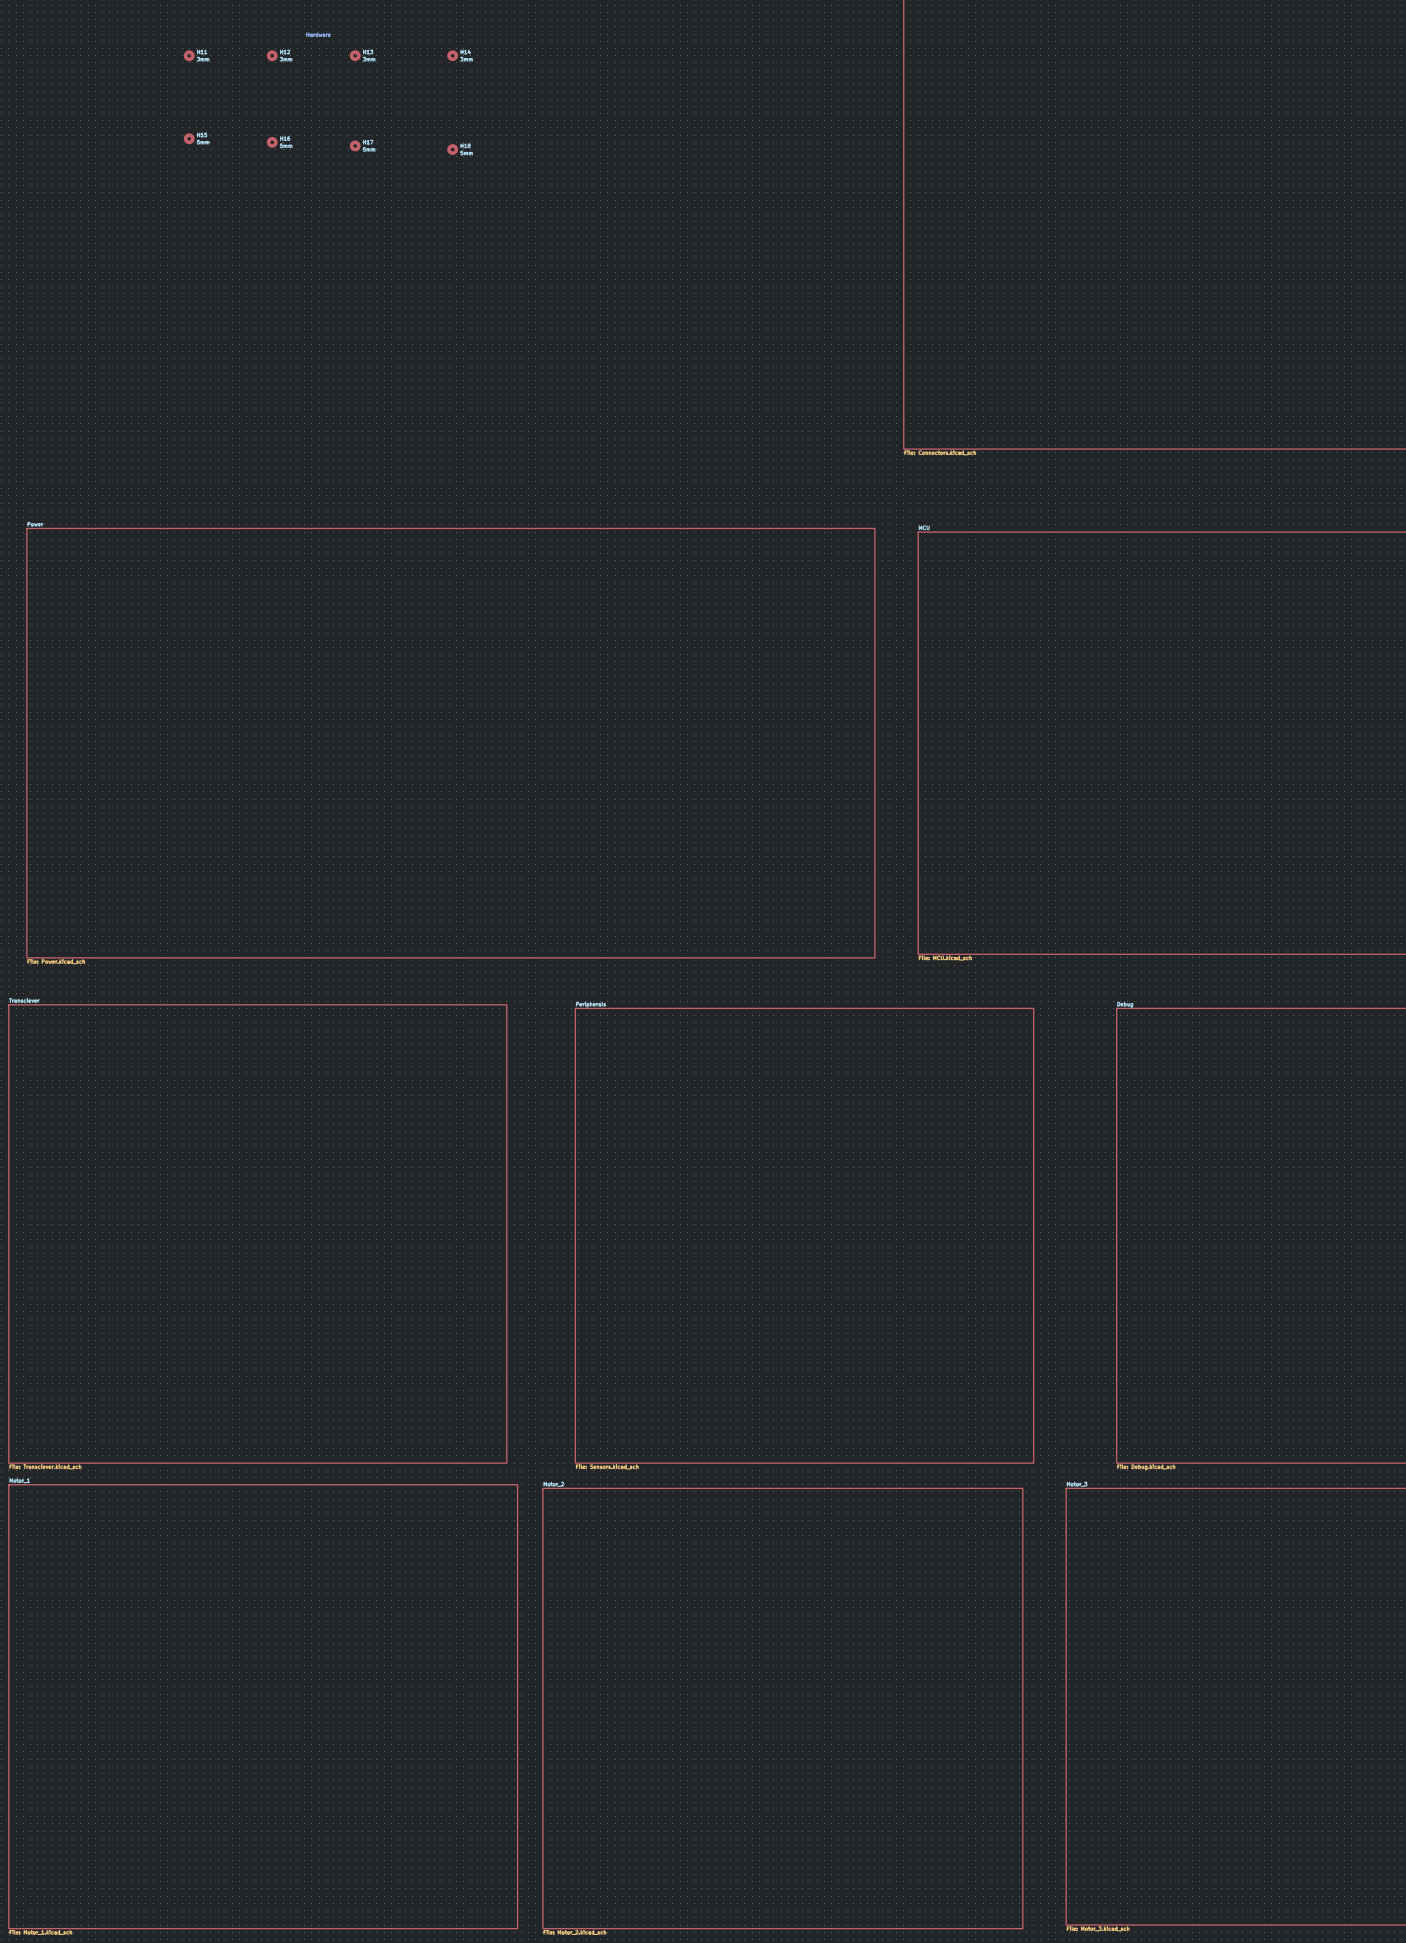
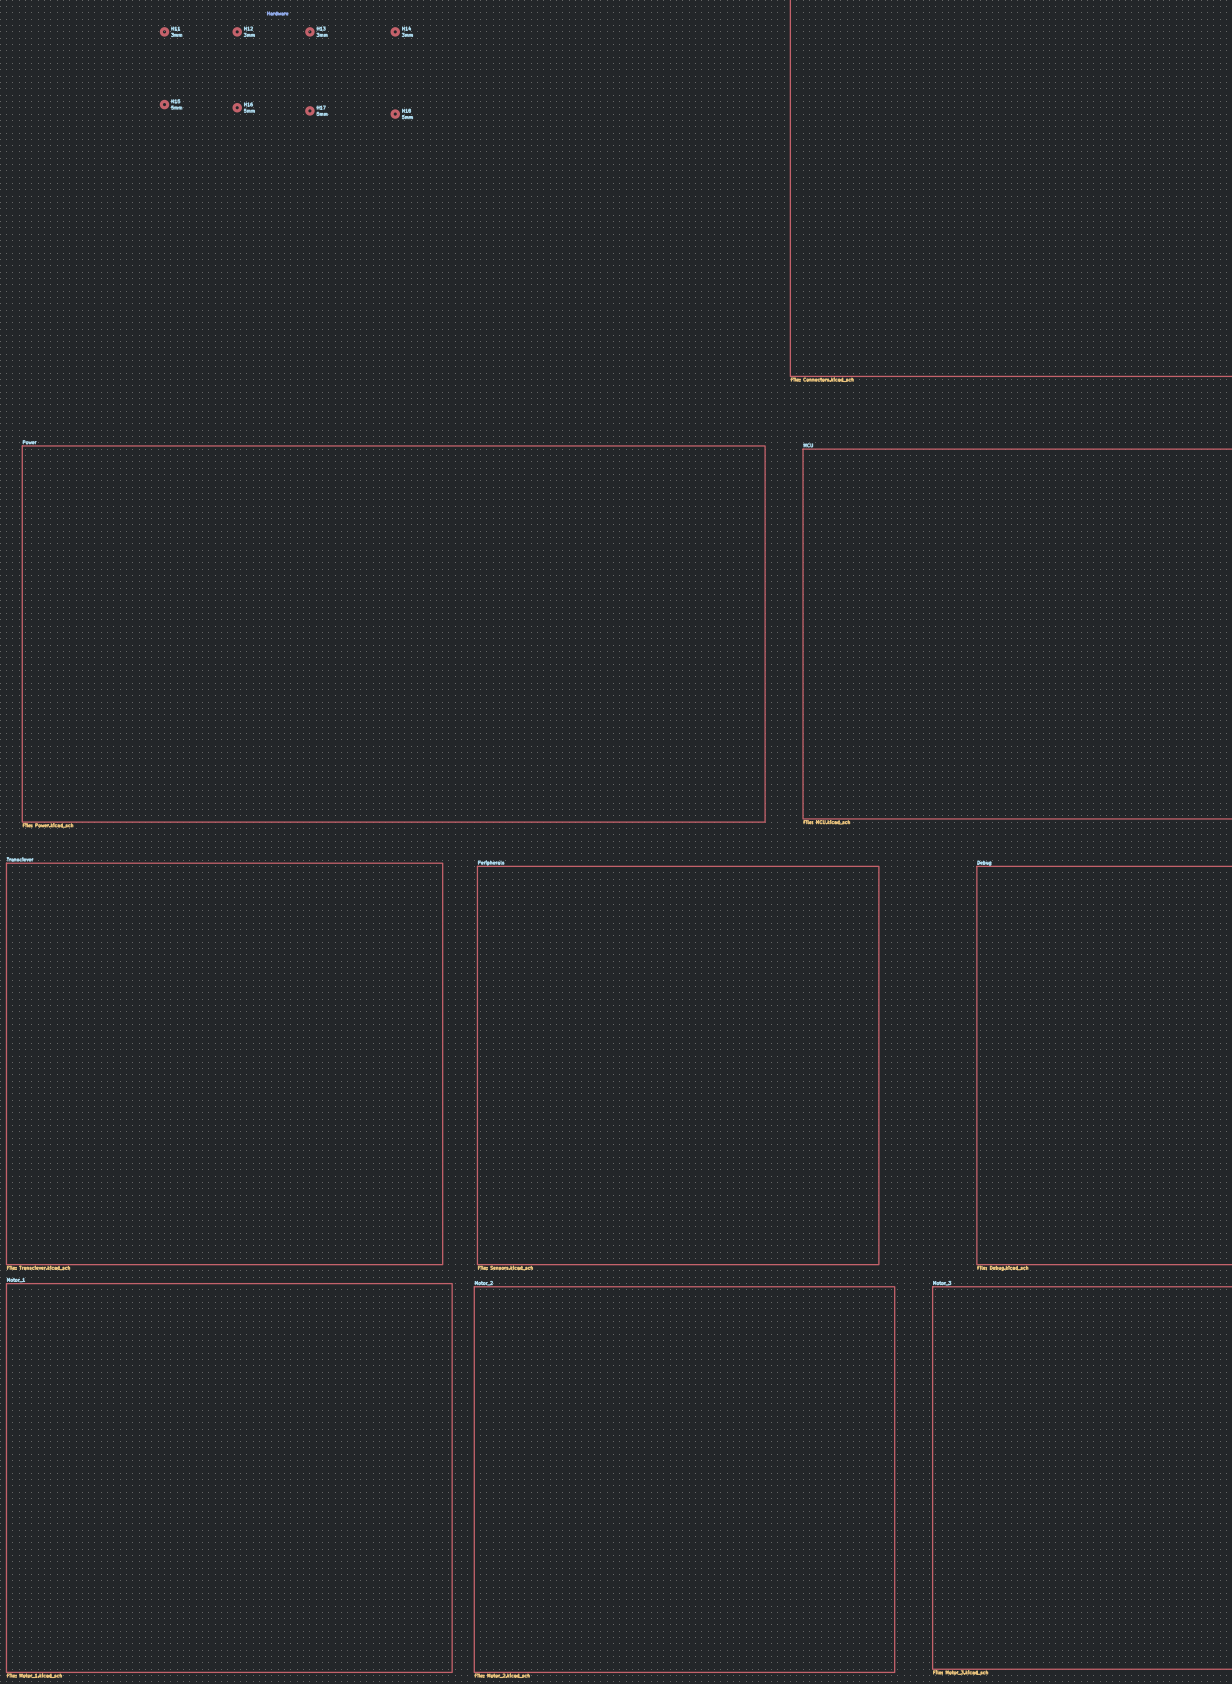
sheet position: (804, 1235) -> (678, 1065)

